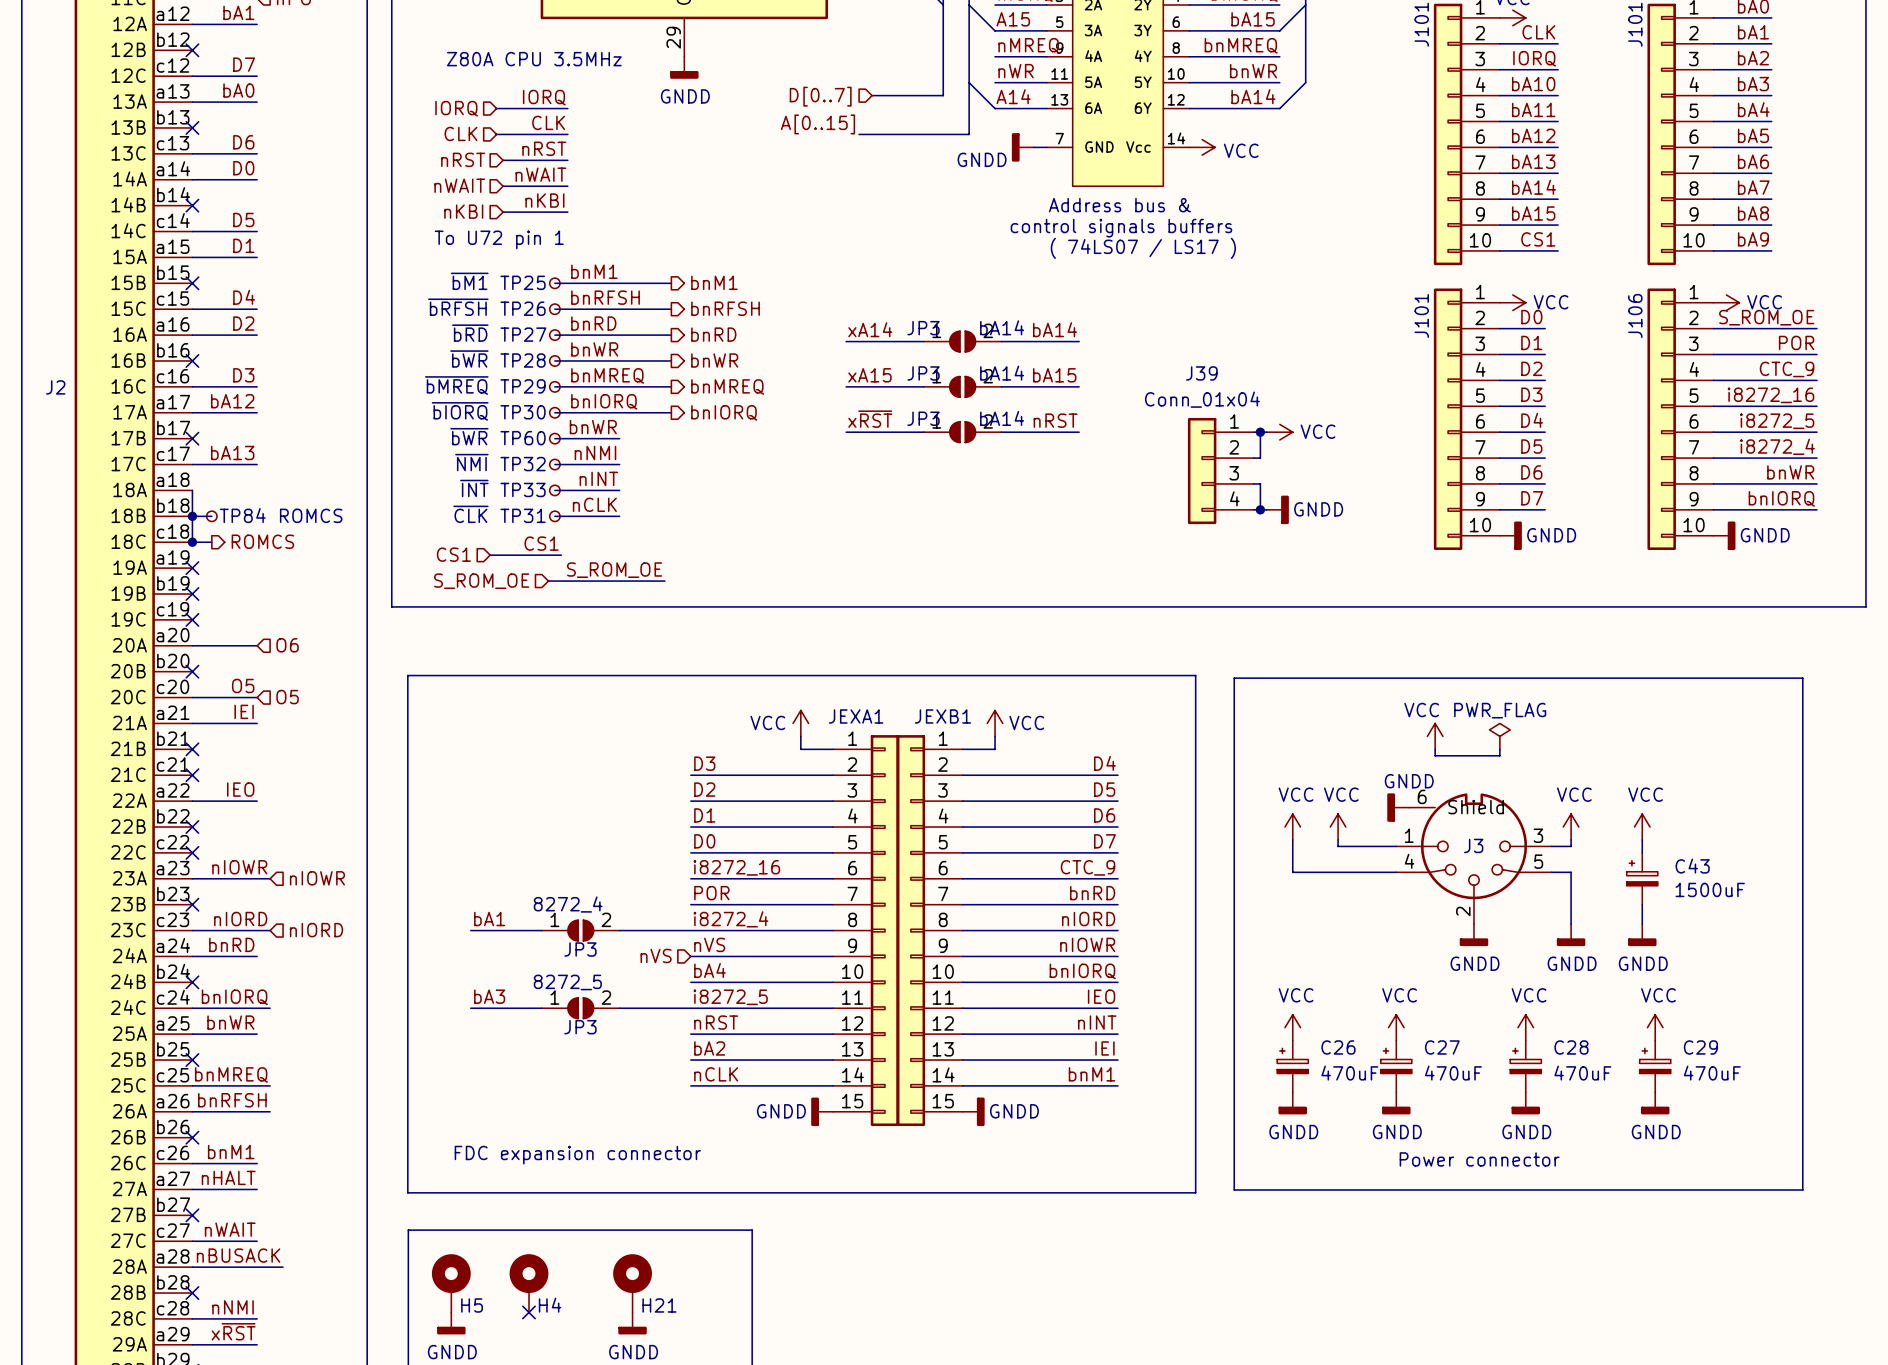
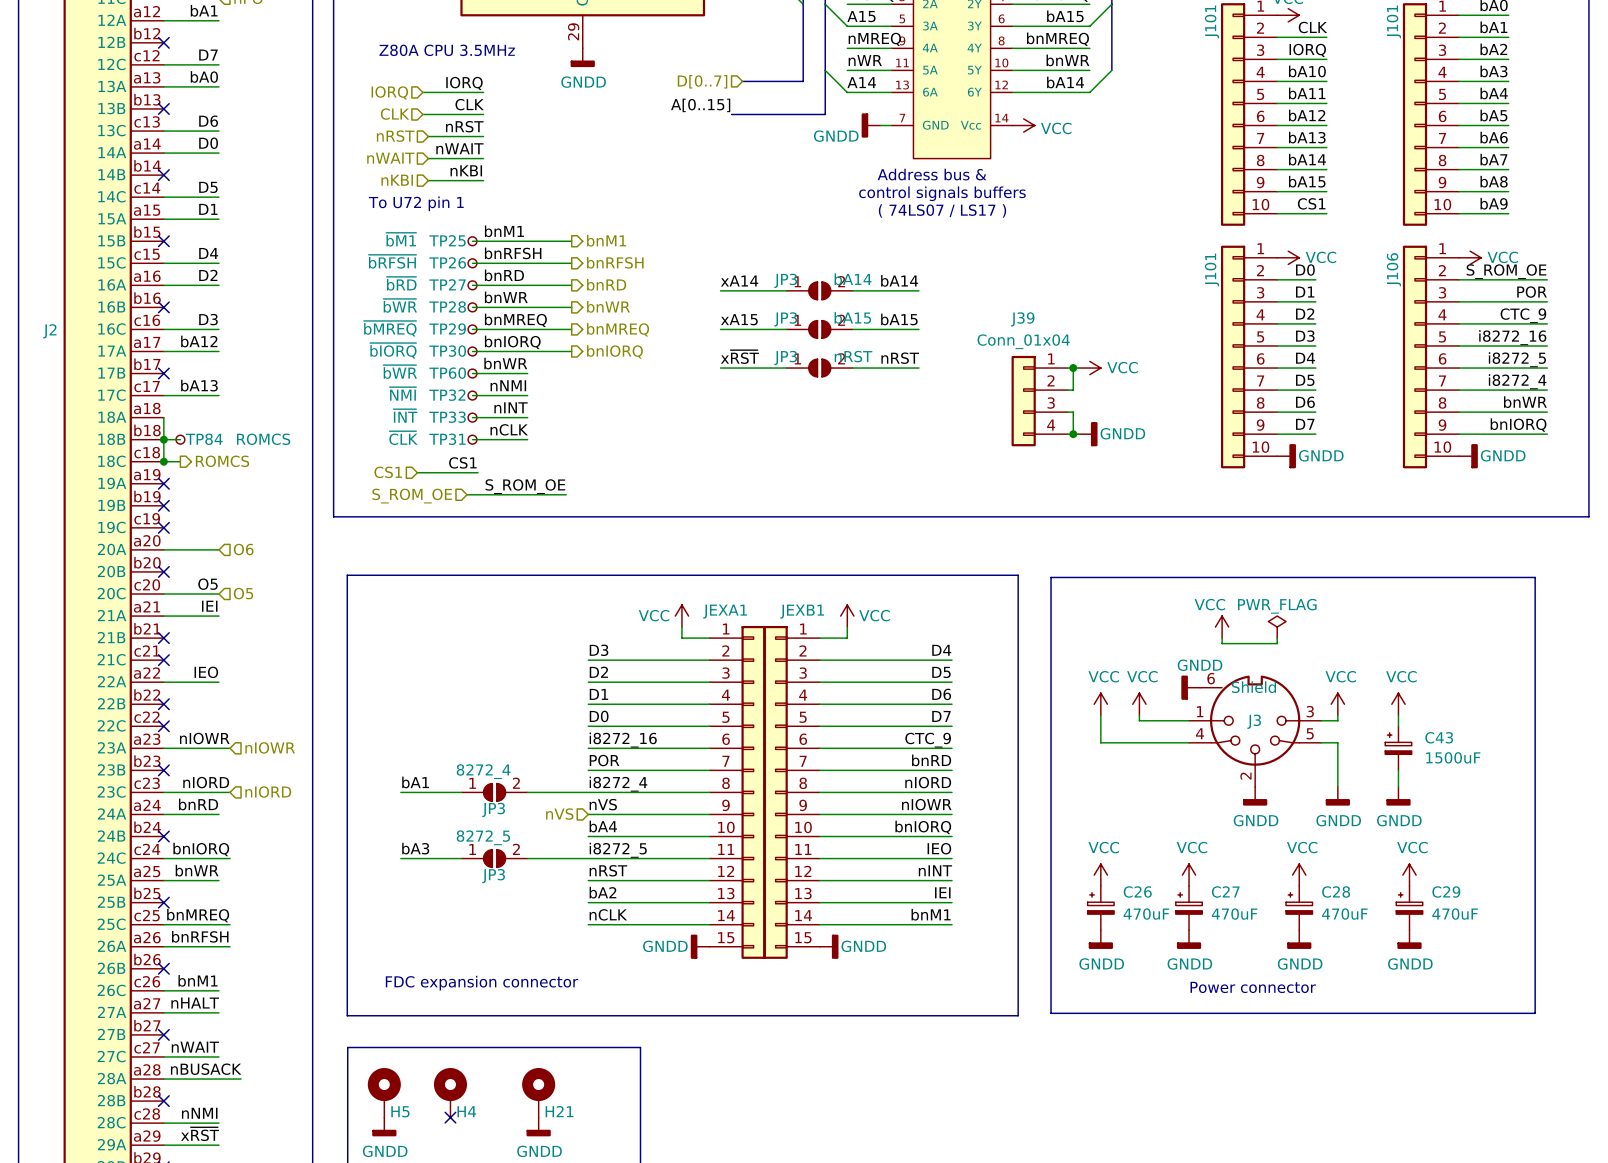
JP3 value: bA14 (1002, 373) -> bA15 (852, 317)
JP3 value: bA14 (1002, 418) -> nRST (853, 356)

